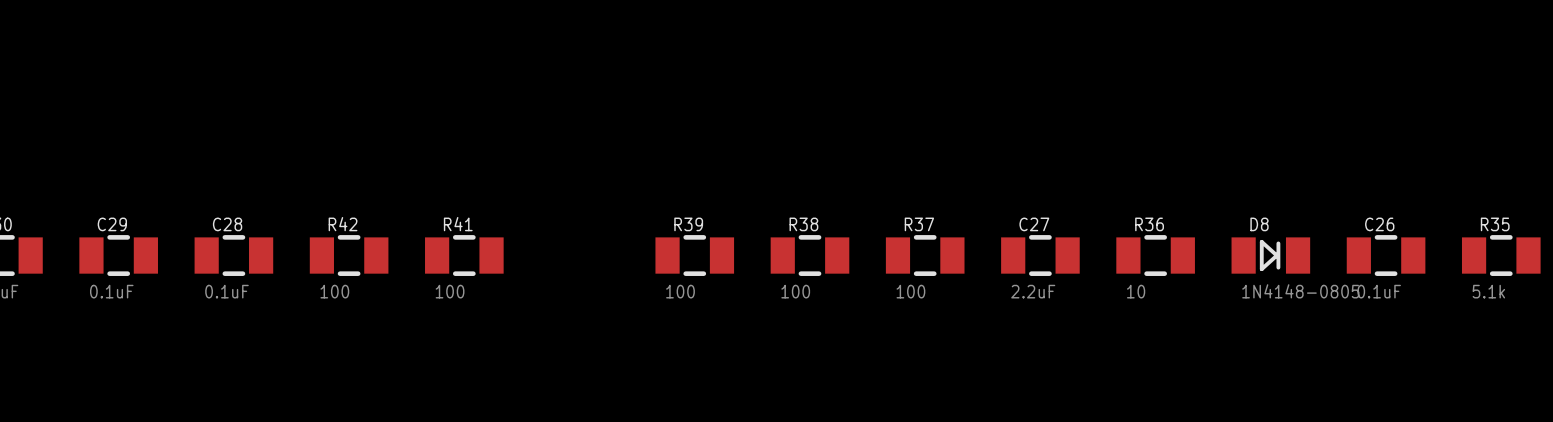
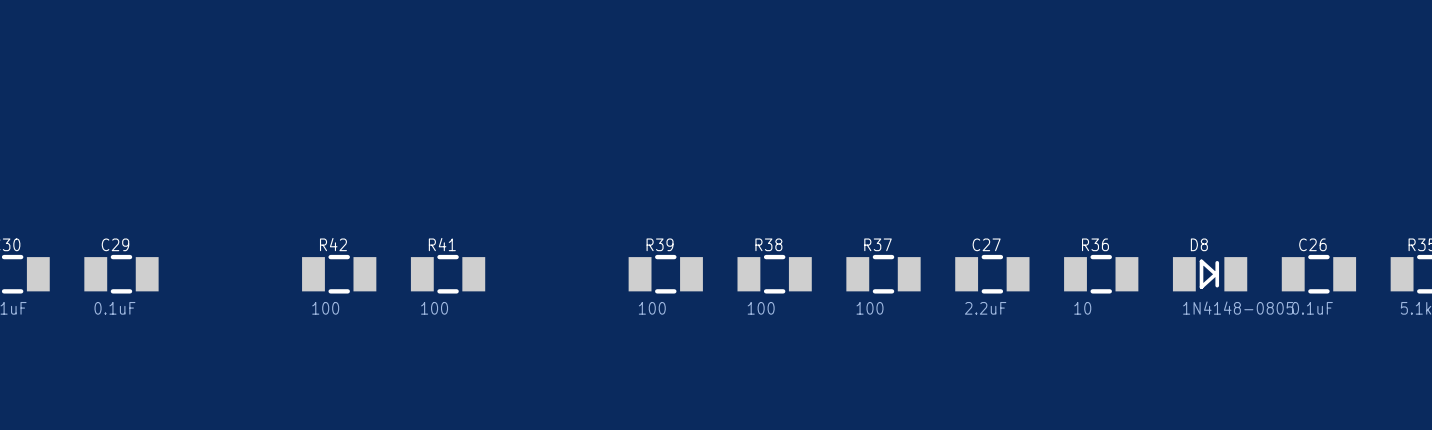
C28: 0.1uF (233, 255) -> none

